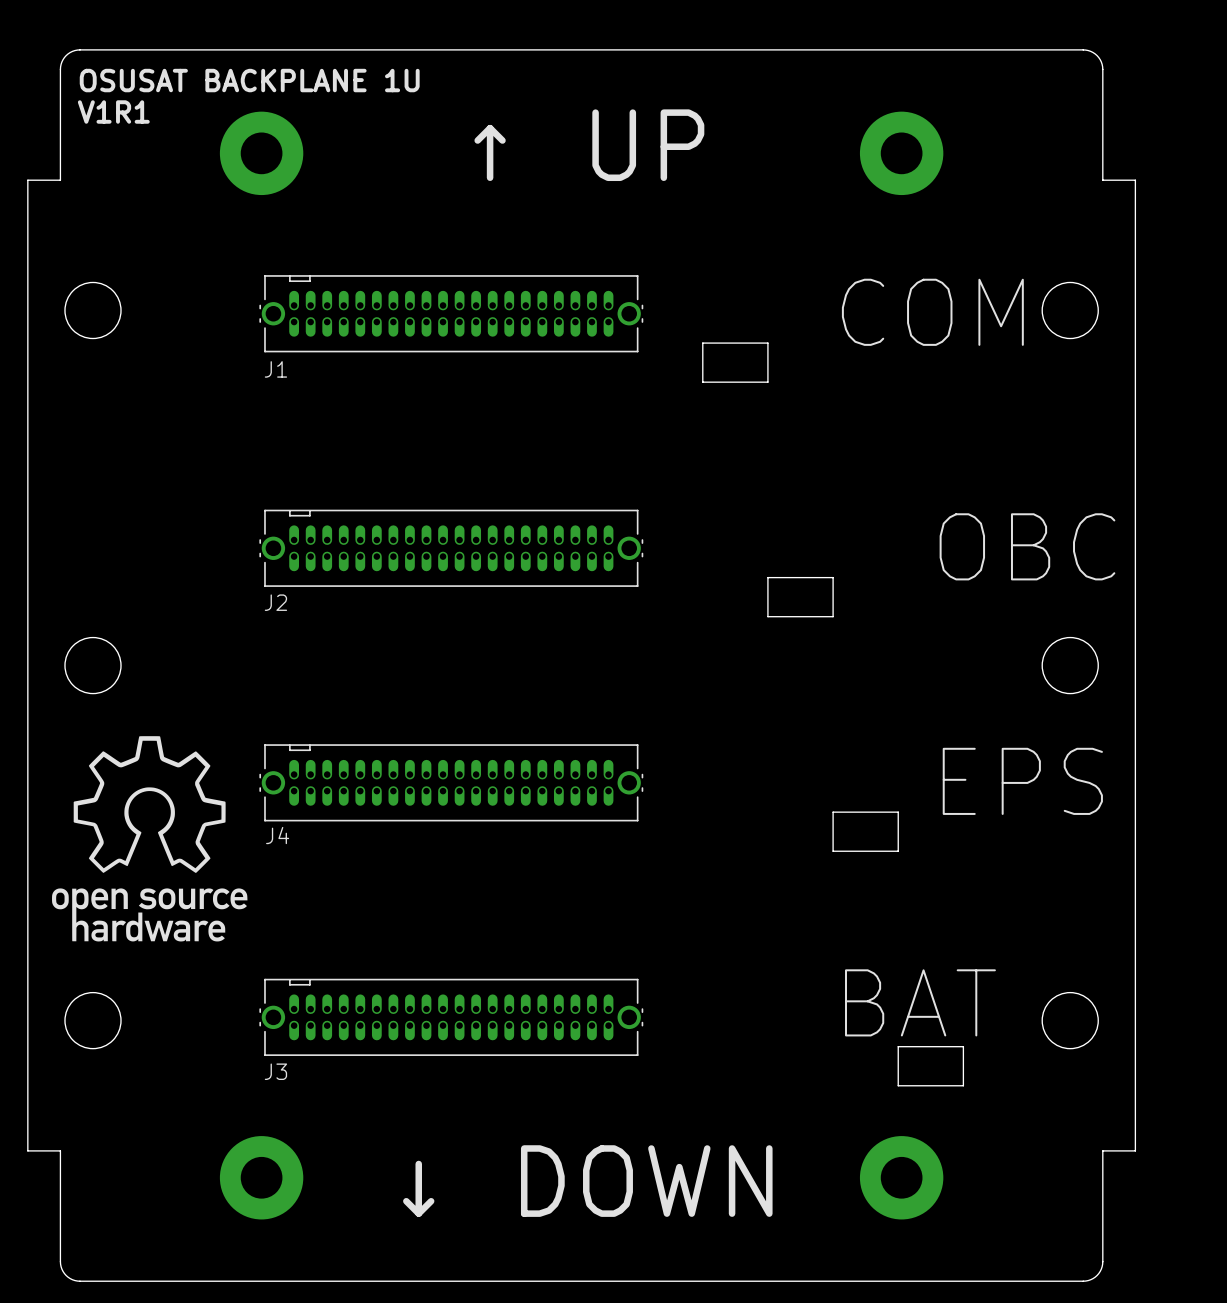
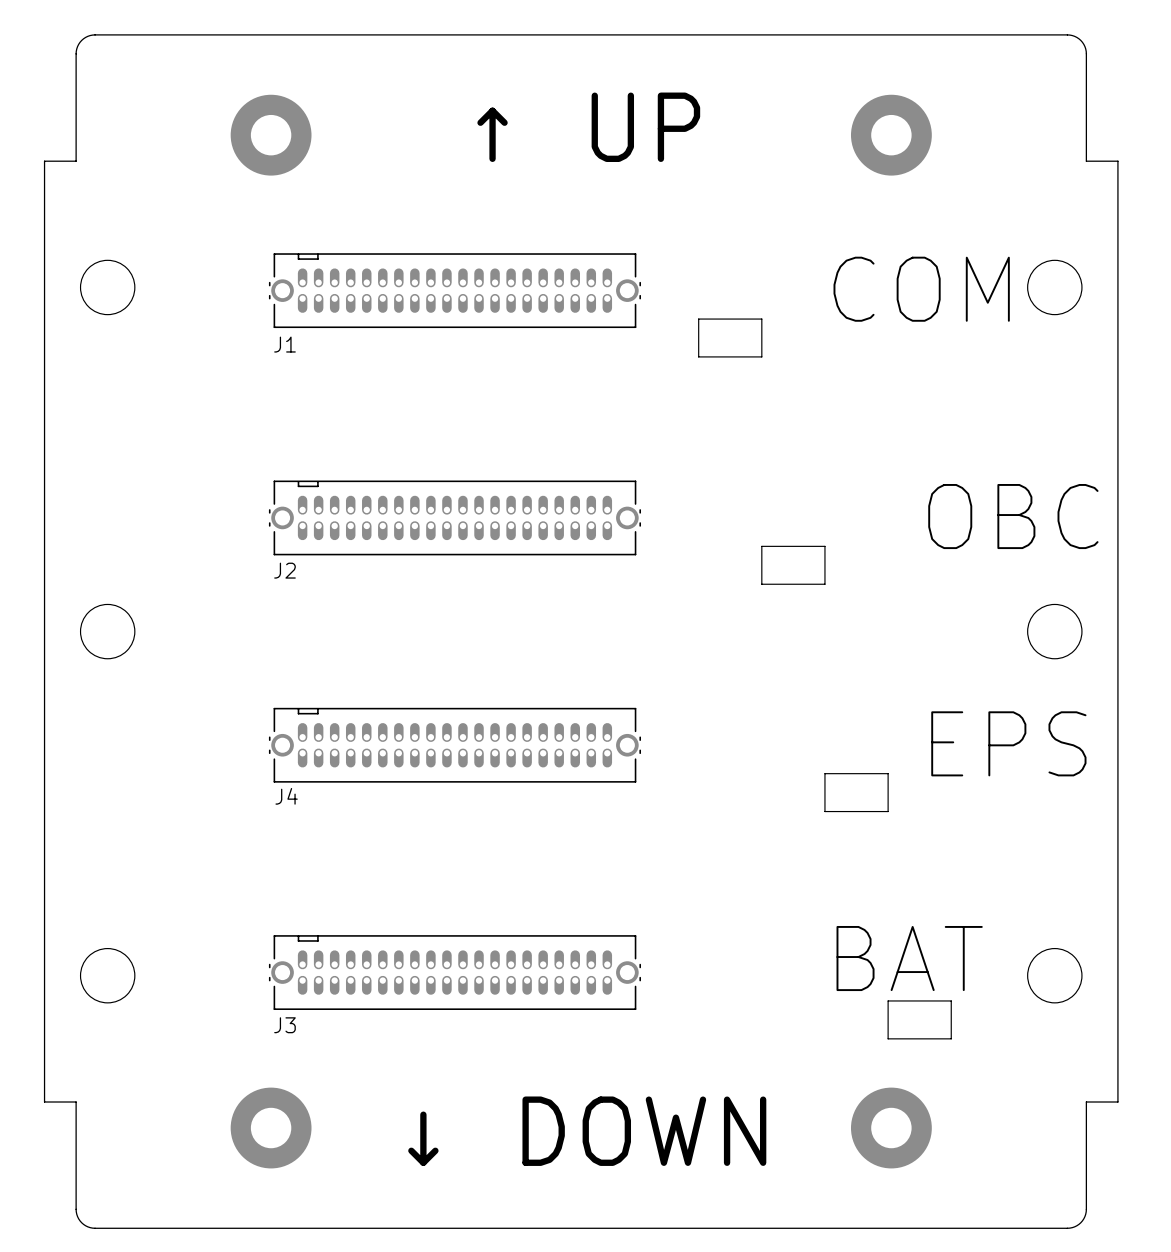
text: OSUSAT BACKPLANE 1U (249, 80) -> none
text: V1R1 (113, 112) -> none
drawing: [52, 736, 248, 942] -> none

